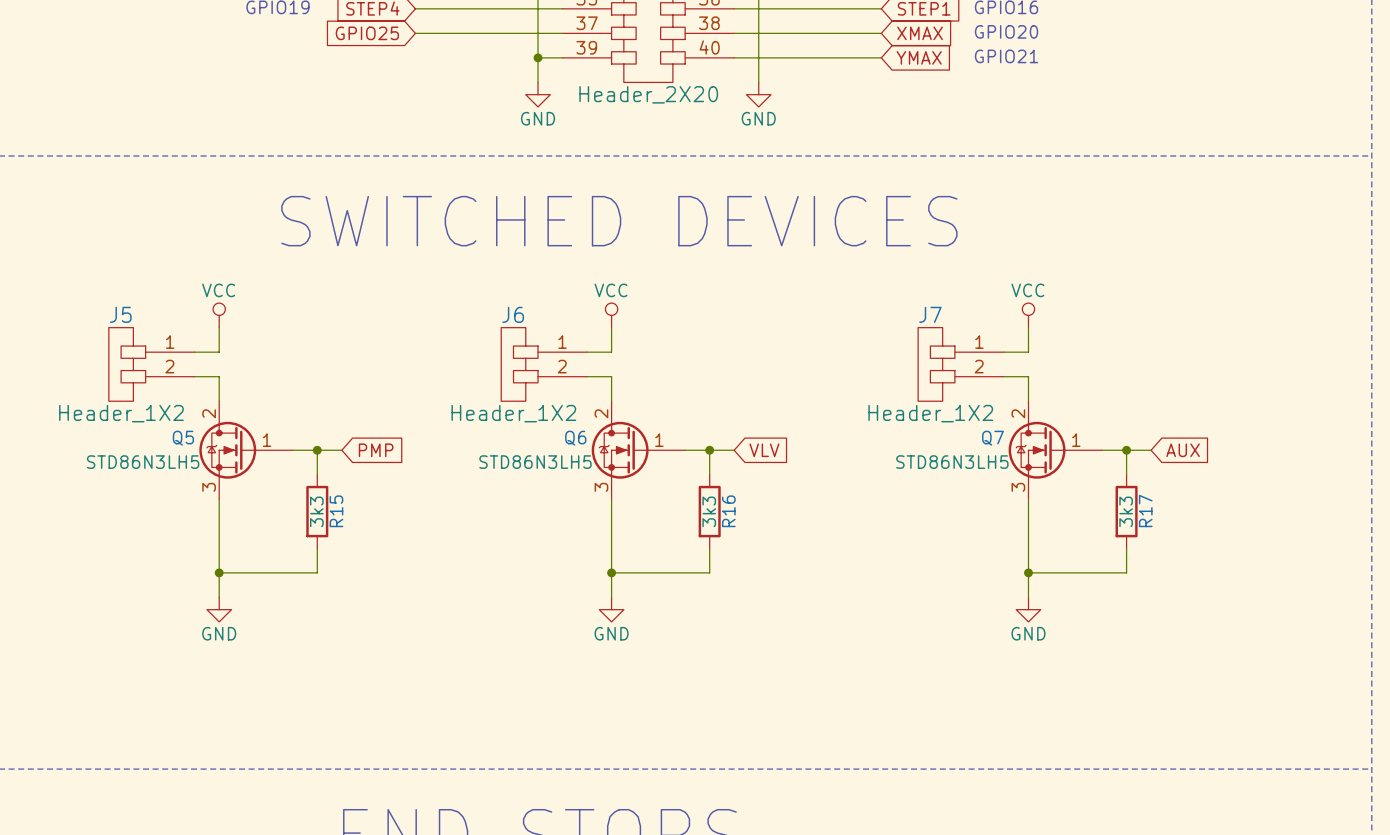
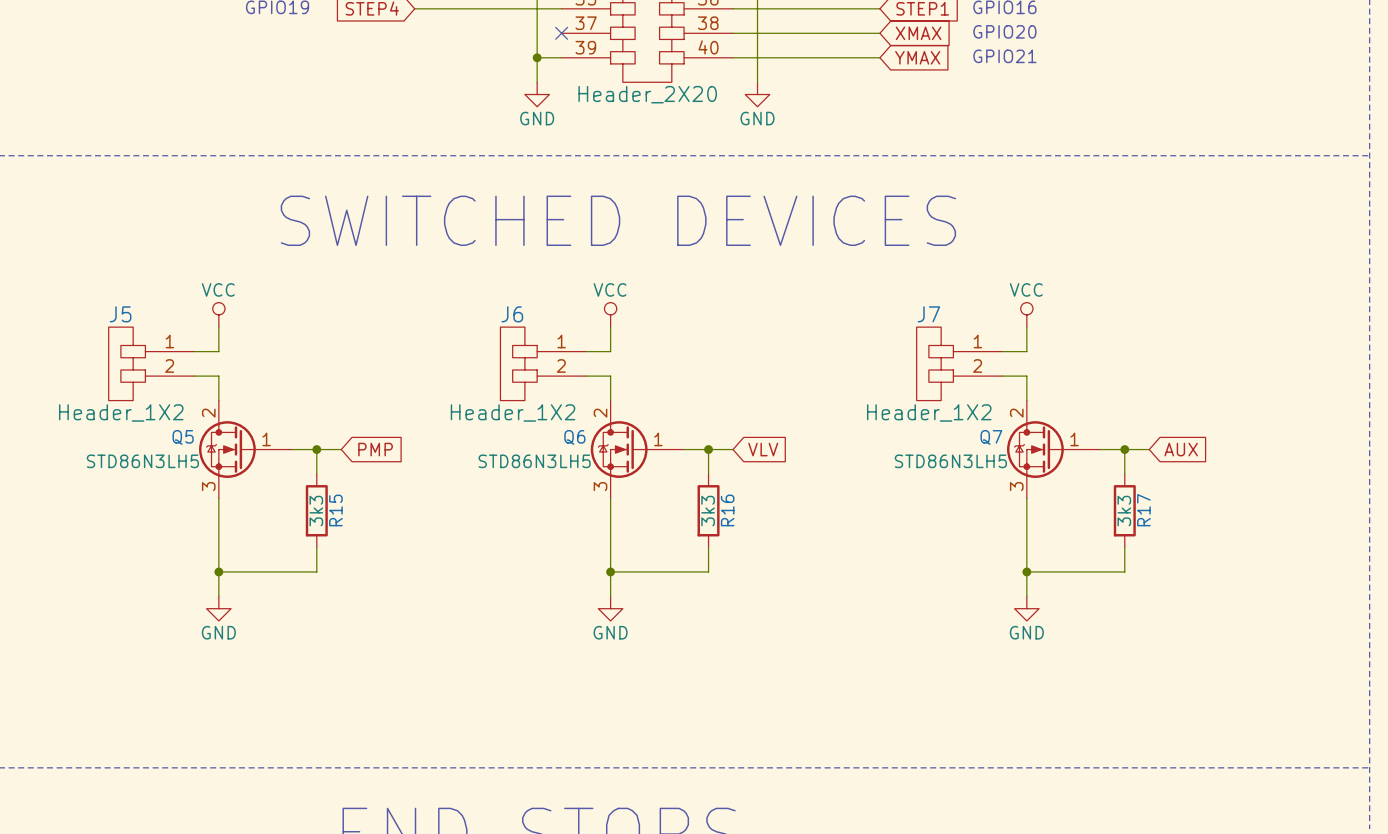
global label: GPIO25 (367, 33) -> none
wire: (415, 33) (562, 33) -> none
no-connect mark: none -> (561, 33)

